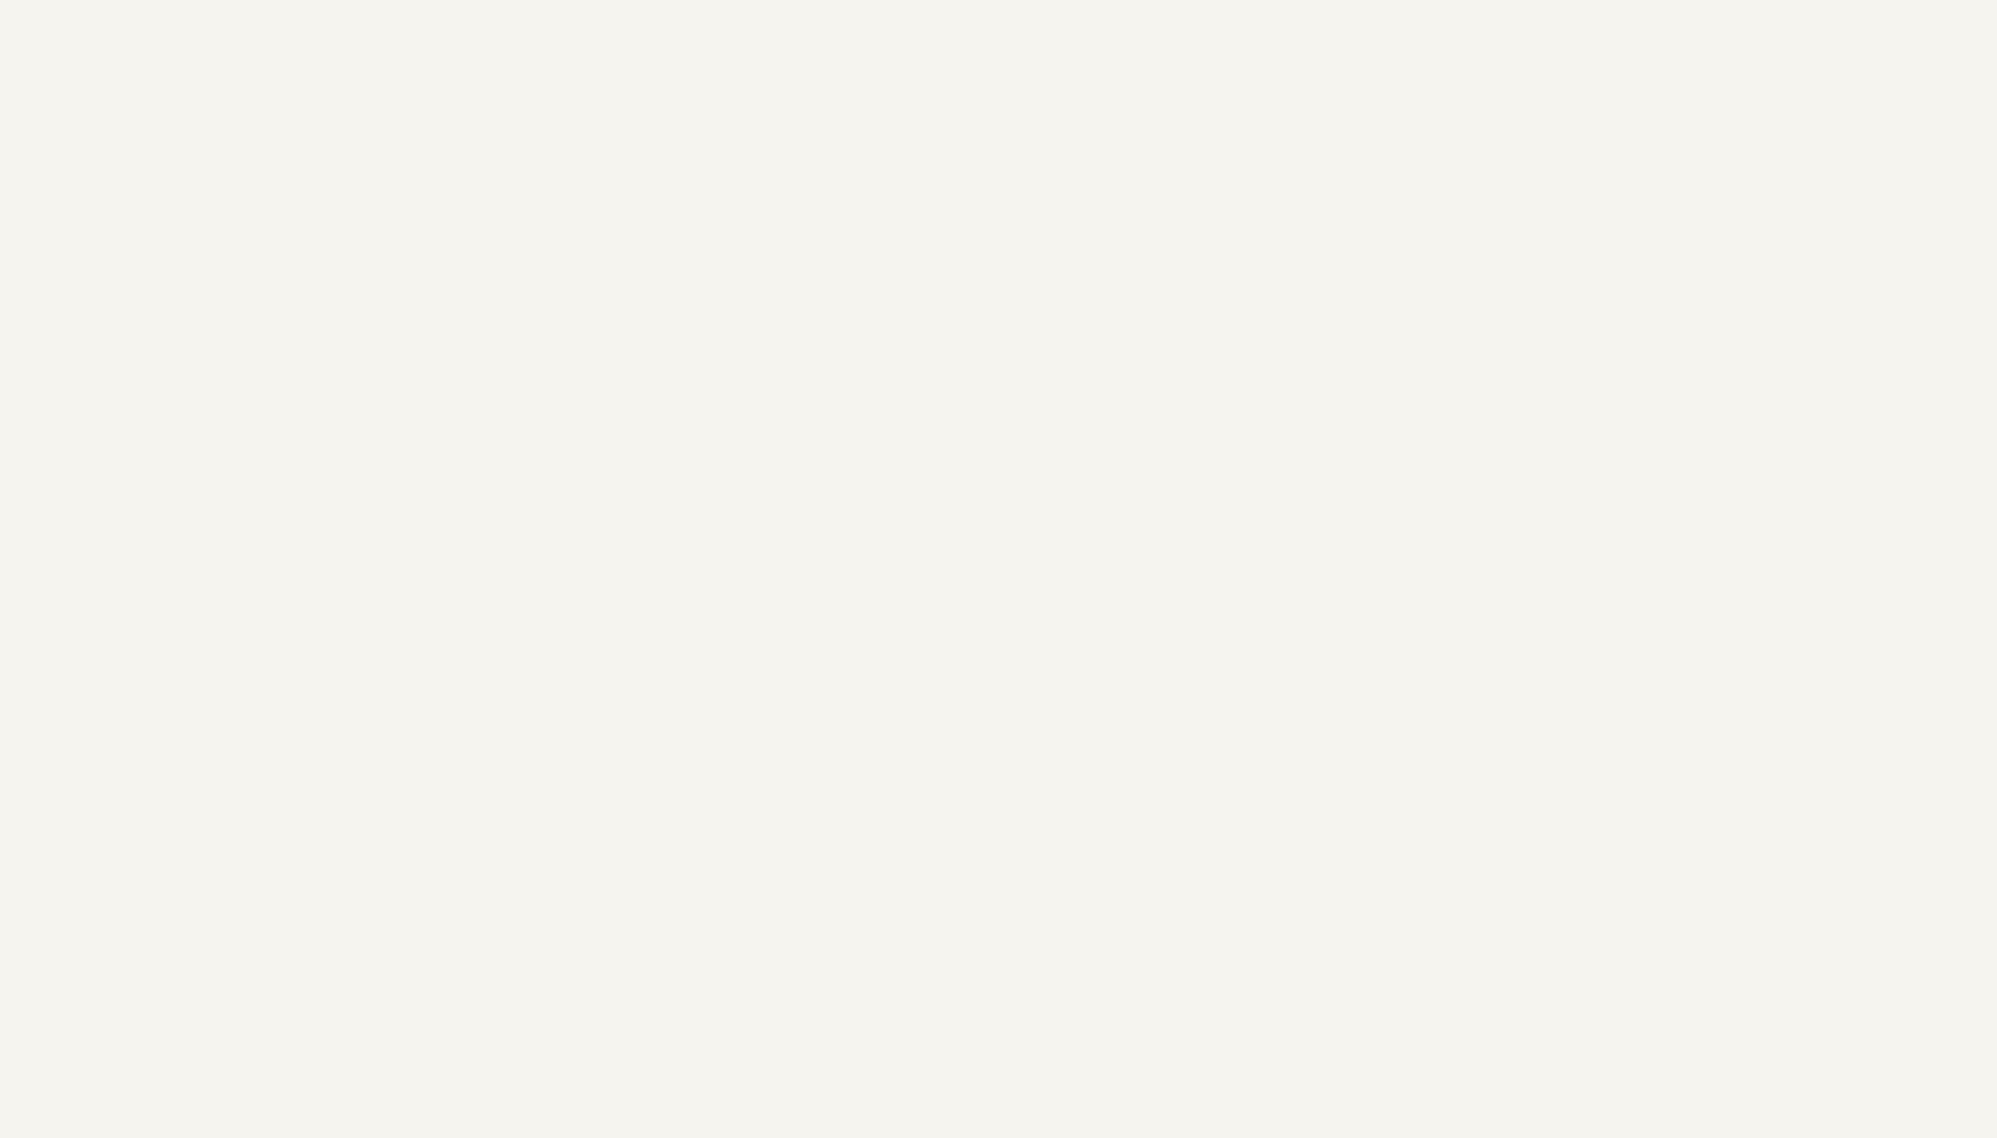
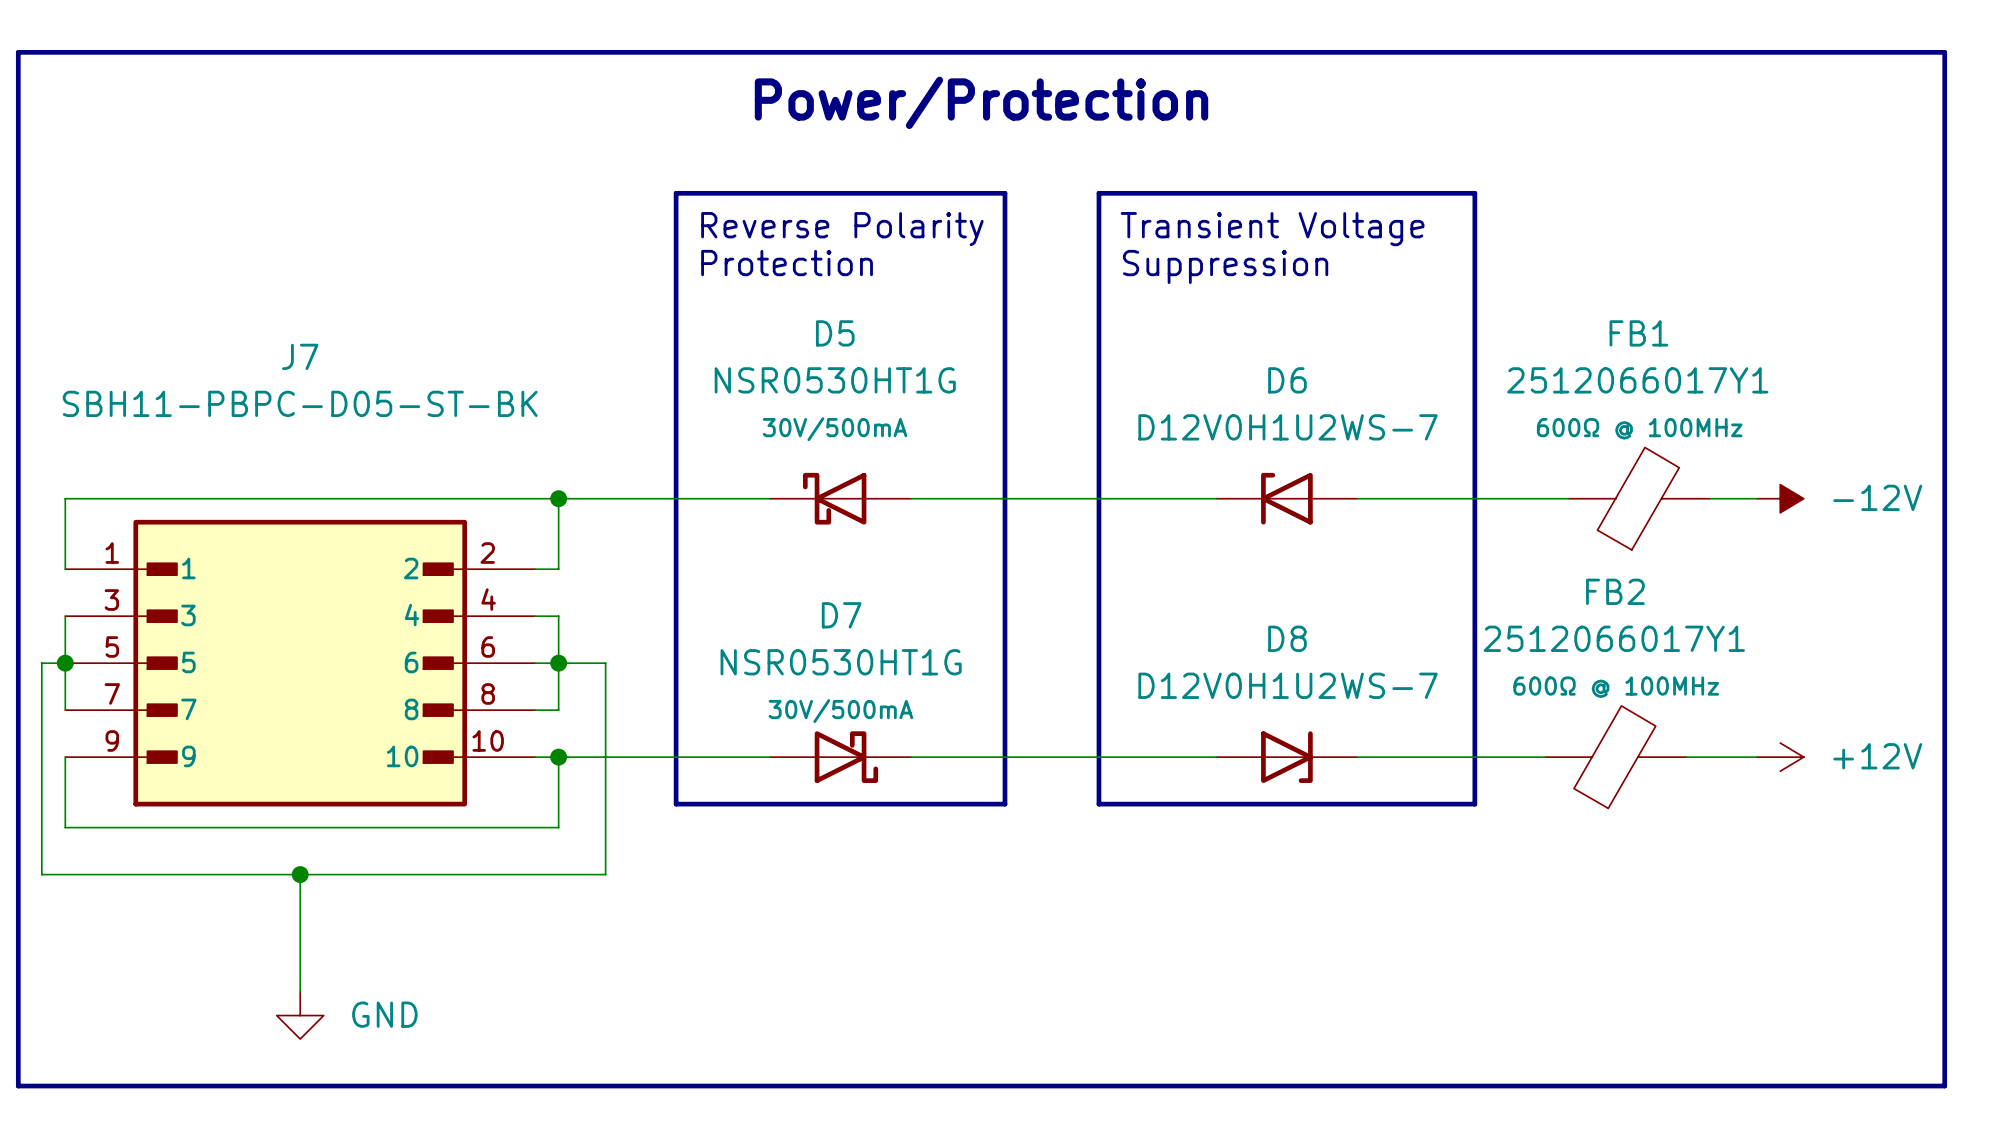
line: none -> (18, 52) (1944, 52) (1944, 1086) (18, 1086) (18, 52)
text: none -> Power/Protection (981, 102)
line: none -> (676, 193) (1005, 193) (1005, 804) (676, 804) (676, 193)
line: none -> (1098, 193) (1474, 193) (1474, 804) (1098, 804) (1098, 193)
text: none -> Reverse Polarity (842, 229)
text: none -> Transient Voltage (1272, 229)
text: none -> Protection (787, 263)
text: none -> Suppression (1225, 266)
wire: none -> (558, 498) (558, 569) (535, 569)
junction: none -> (558, 498)
wire: none -> (770, 498) (65, 498) (65, 569)
D5: none -> NSR0530HT1G (840, 498)
wire: none -> (911, 498) (1216, 498)
D6: none -> D12V0H1U2WS-7 (1286, 498)
wire: none -> (1357, 498) (1568, 498)
FB1: none -> 2512066017Y1 (1639, 498)
wire: none -> (1709, 498) (1756, 498)
power symbol: none -> -12V (1780, 498)
wire: none -> (65, 616) (65, 710)
wire: none -> (535, 616) (558, 616) (558, 710) (535, 710)
wire: none -> (65, 663) (41, 663) (41, 874) (605, 874) (605, 663) (535, 663)
junction: none -> (65, 663)
J7: none -> SBH11-PBPC-D05-ST-BK (300, 663)
junction: none -> (558, 663)
wire: none -> (65, 757) (65, 827) (558, 827) (558, 757)
wire: none -> (535, 757) (770, 757)
junction: none -> (558, 757)
D7: none -> NSR0530HT1G (840, 757)
wire: none -> (911, 757) (1216, 757)
D8: none -> D12V0H1U2WS-7 (1286, 757)
wire: none -> (1357, 757) (1545, 757)
FB2: none -> 2512066017Y1 (1615, 757)
wire: none -> (1686, 757) (1756, 757)
power symbol: none -> +12V (1780, 757)
wire: none -> (300, 874) (300, 992)
junction: none -> (300, 874)
power symbol: none -> GND (300, 1015)

